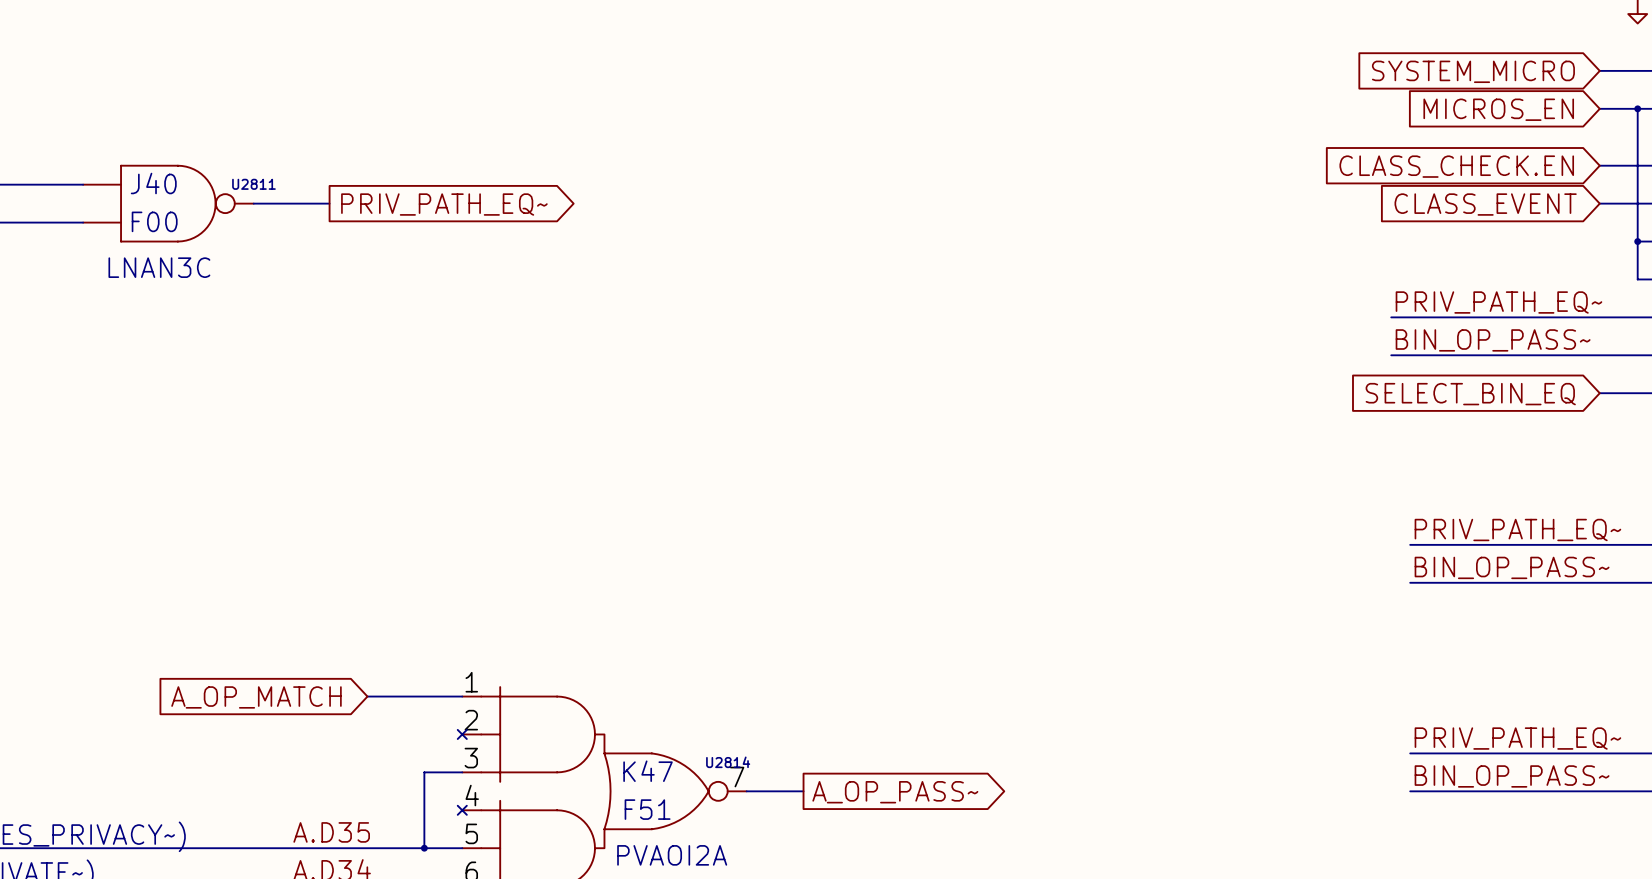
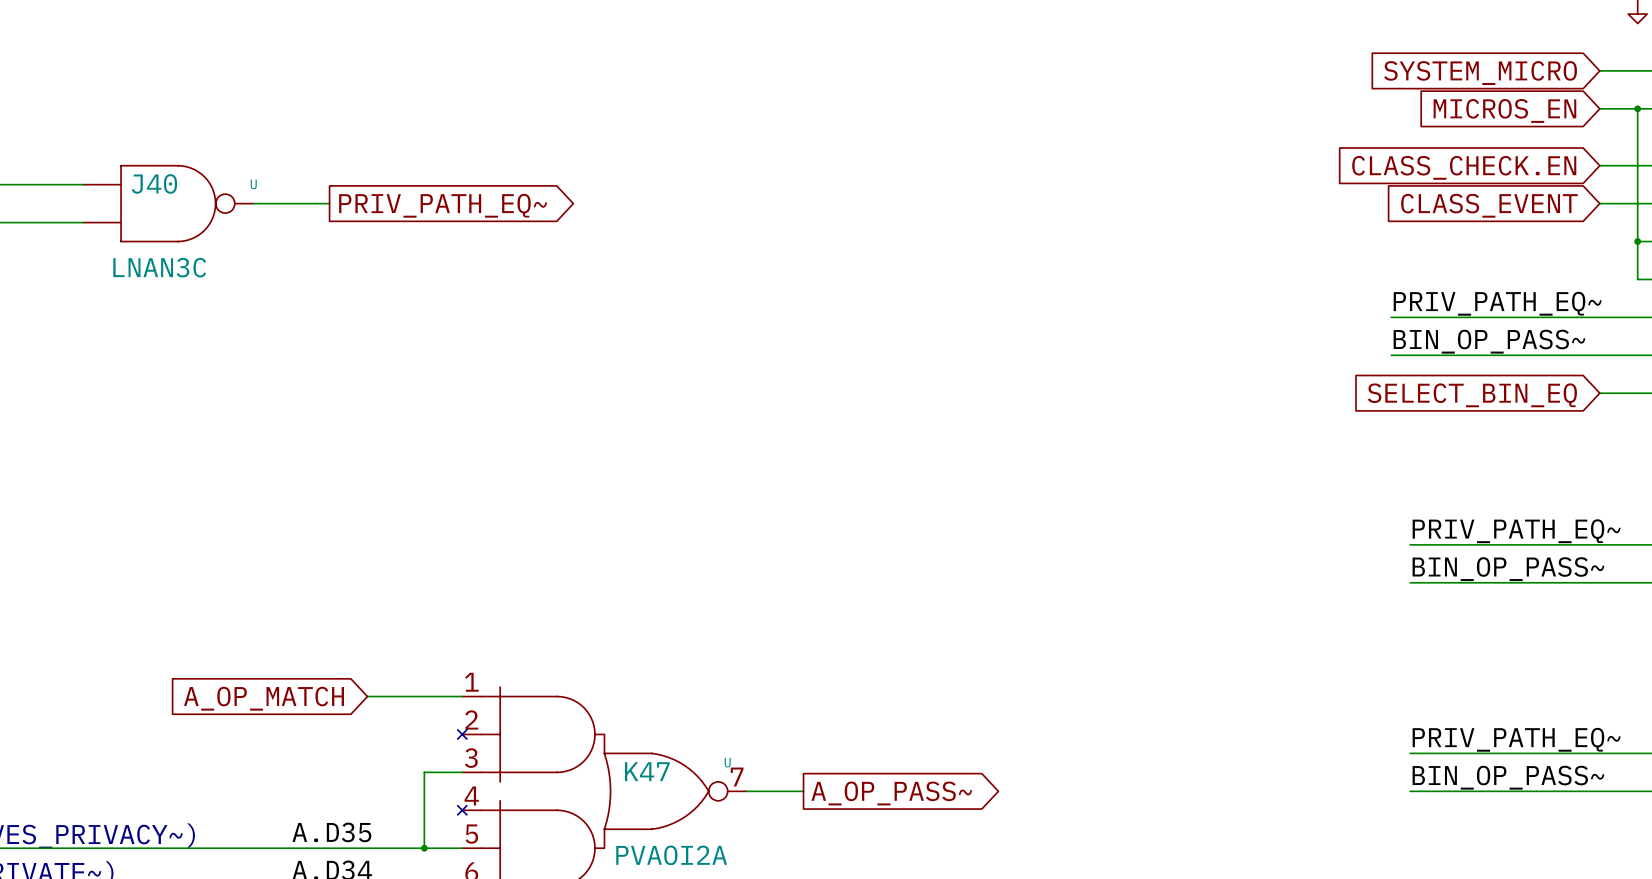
U2811 name: U2811 (253, 184) -> U (253, 184)
U2811 value: F00 (154, 221) -> none
U2814 name: U2814 (728, 762) -> U (727, 762)
U2814 value: F51 (647, 809) -> none

